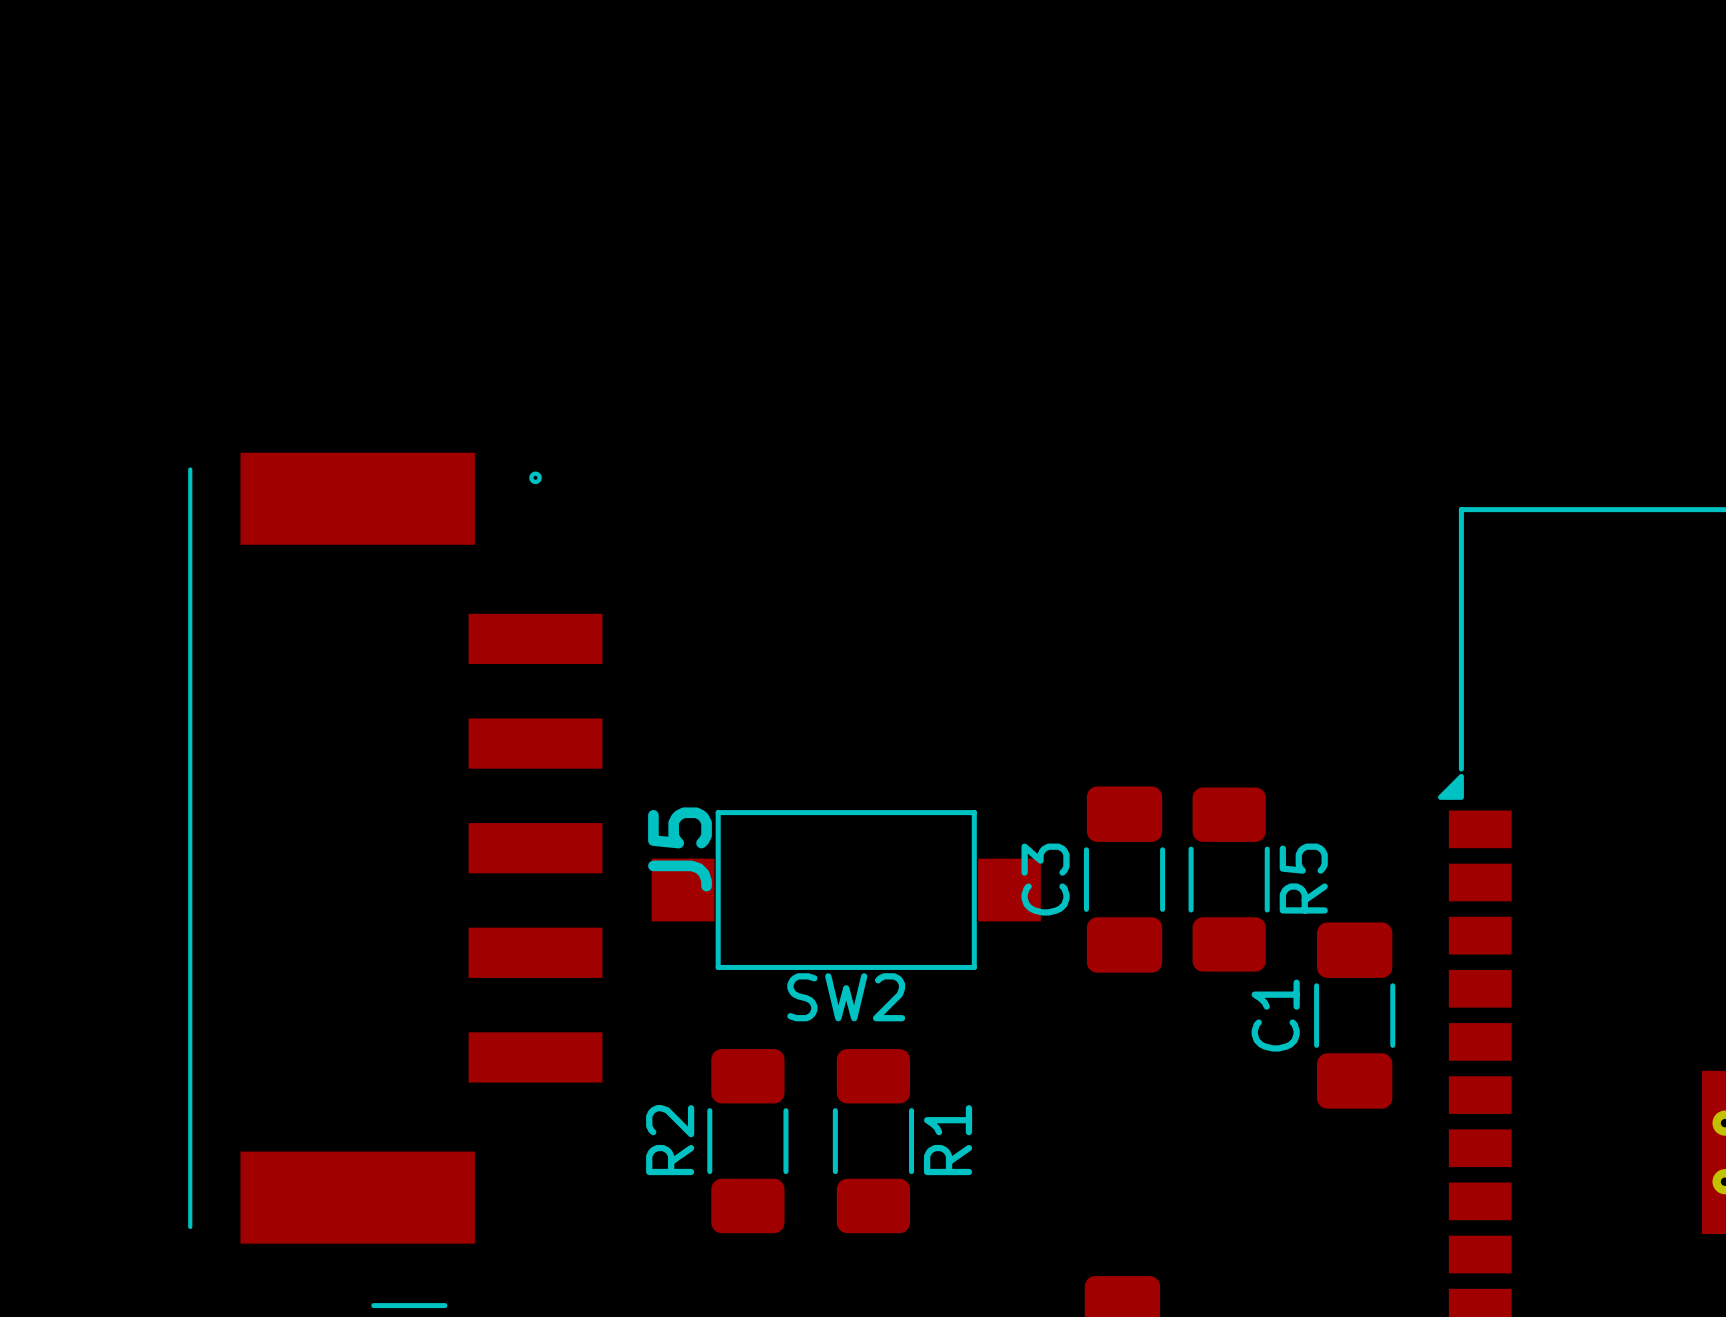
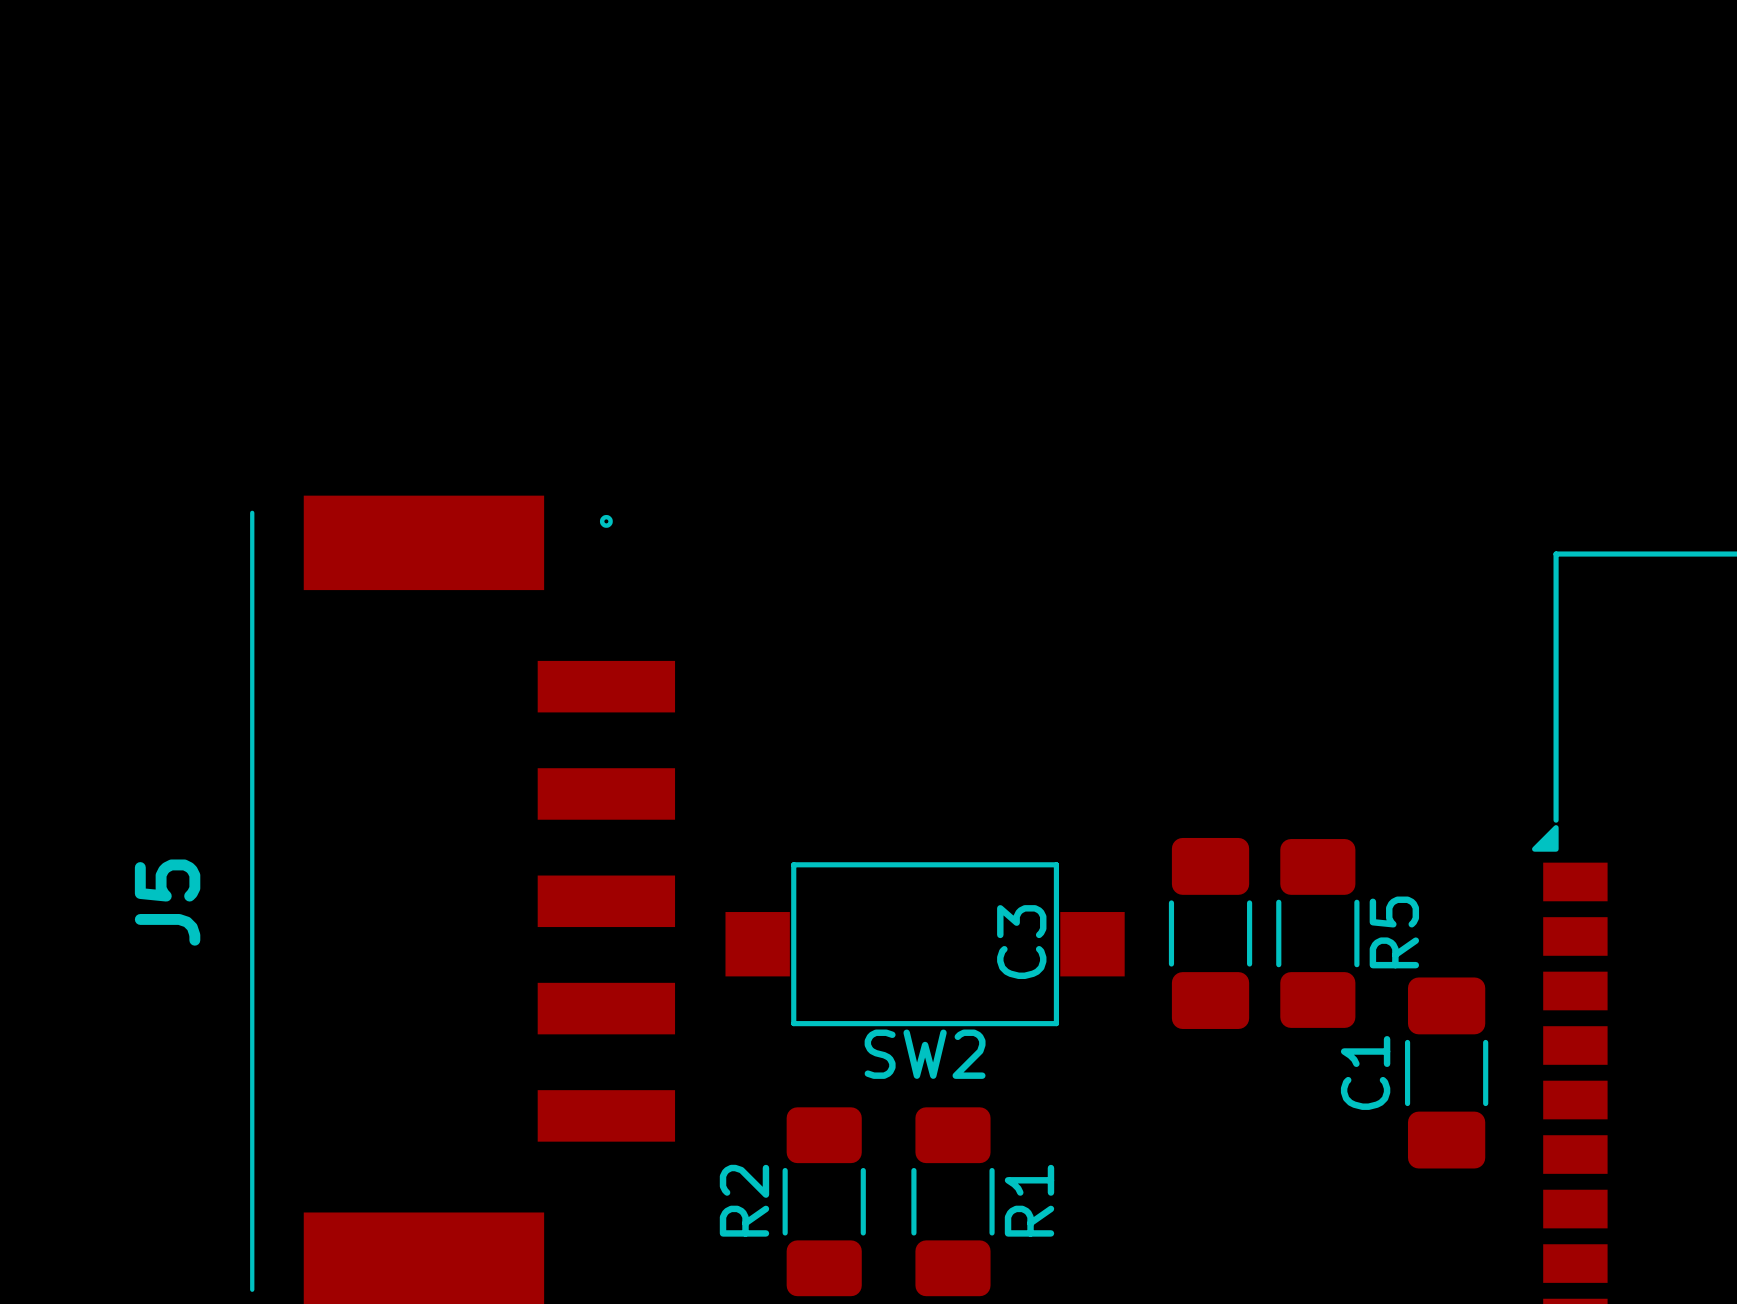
J5 name position: J5 (679, 849) -> J5 (167, 902)
C3 name position: C3 (1045, 879) -> C3 (1021, 942)

